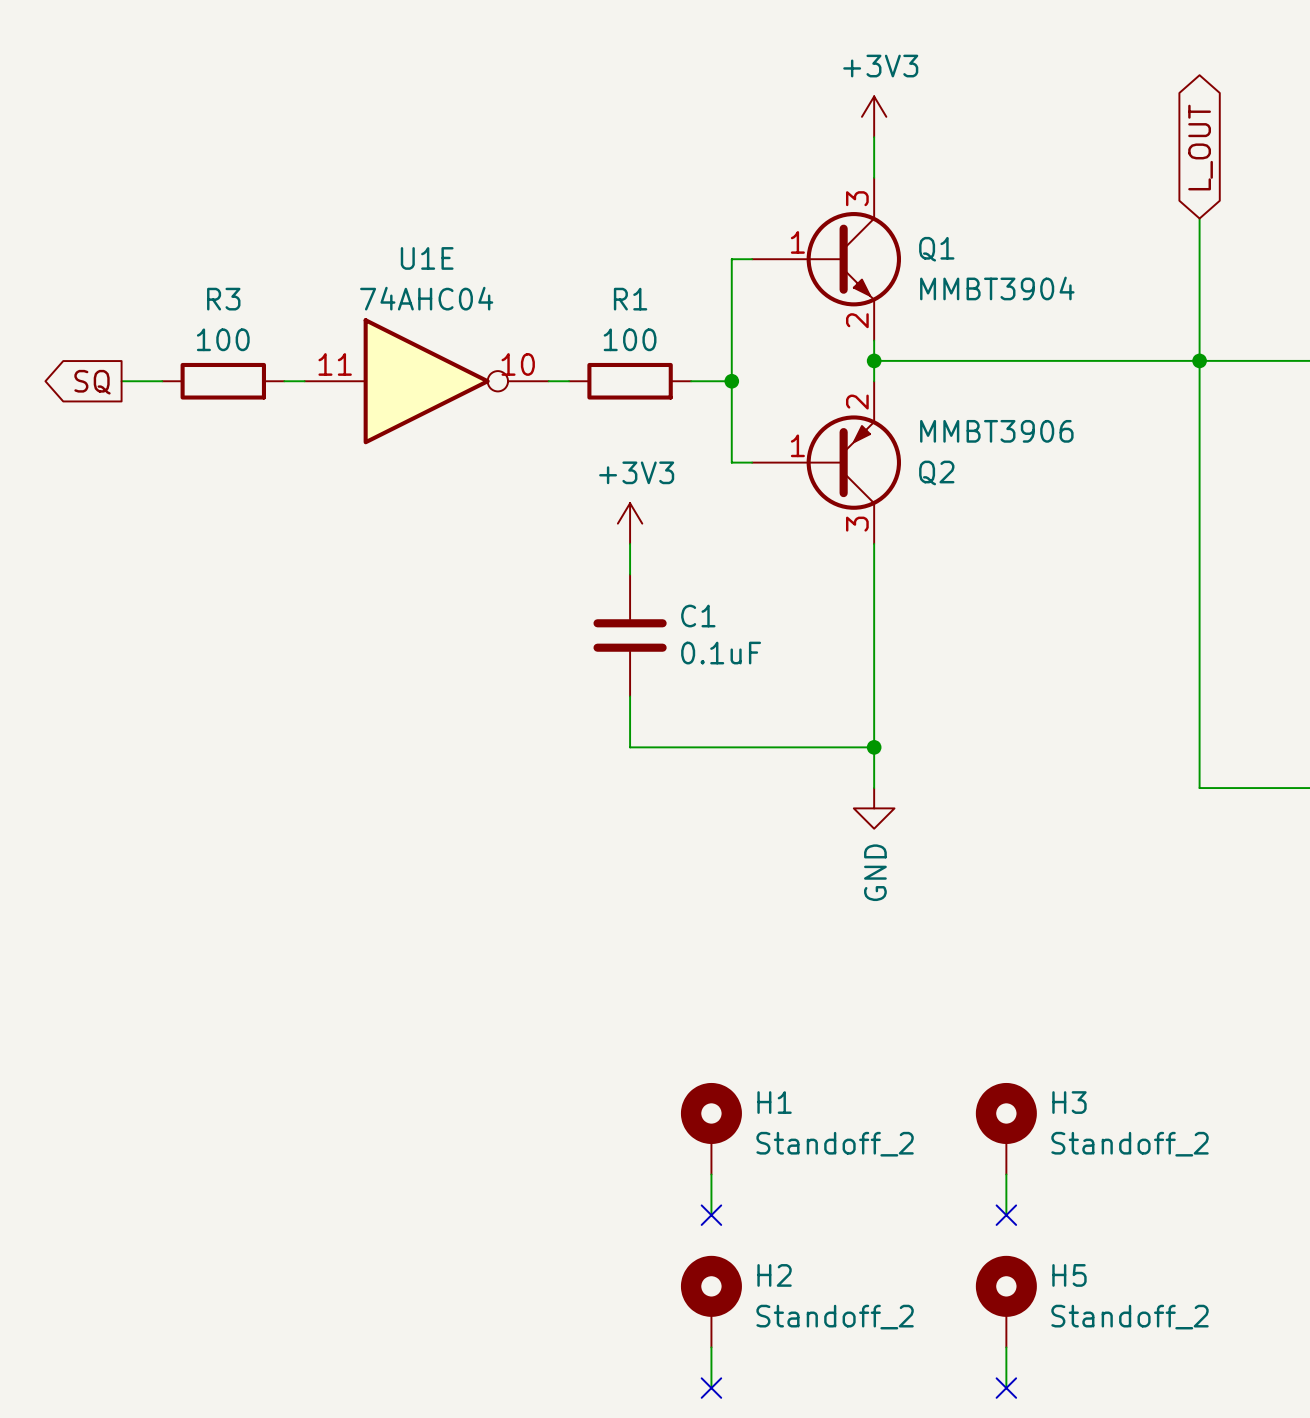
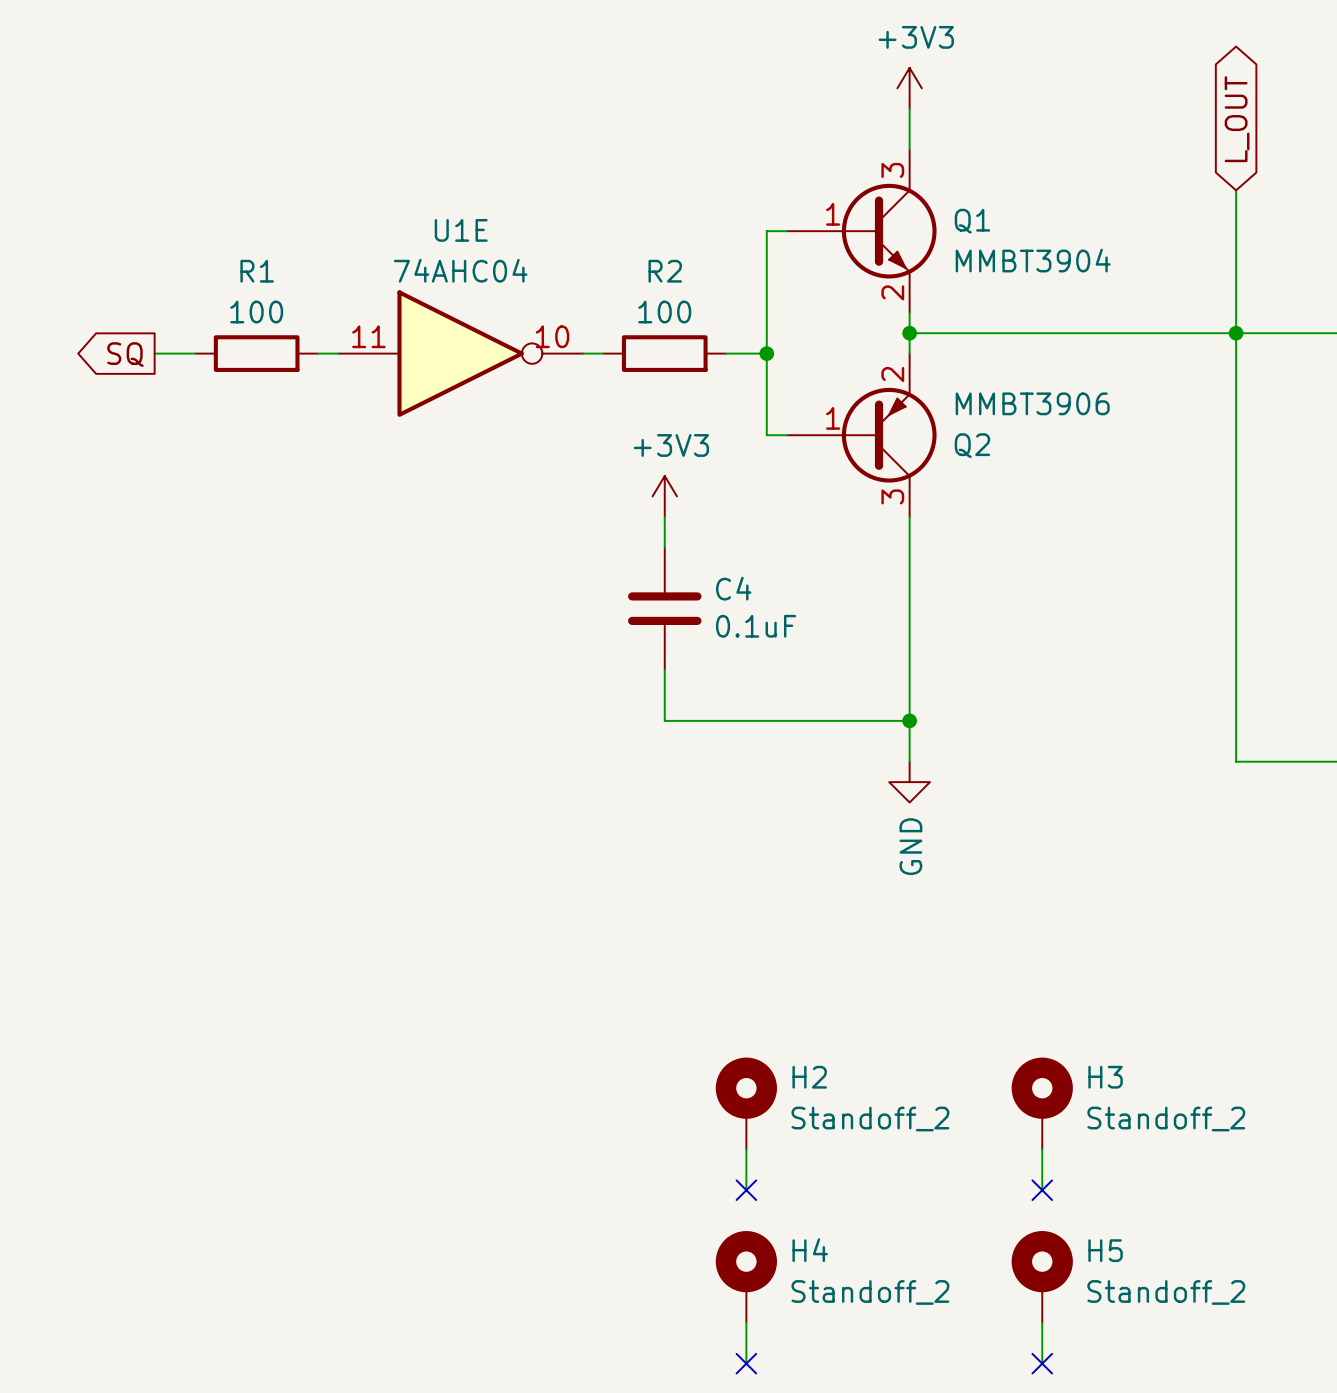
R3 name: R3 (223, 299) -> R1 (257, 271)
R1 name: R1 (630, 299) -> R2 (665, 271)
C1 name: C1 (698, 616) -> C4 (733, 588)
H1 name: H1 (774, 1102) -> H2 (809, 1077)
H2 name: H2 (774, 1275) -> H4 (810, 1250)

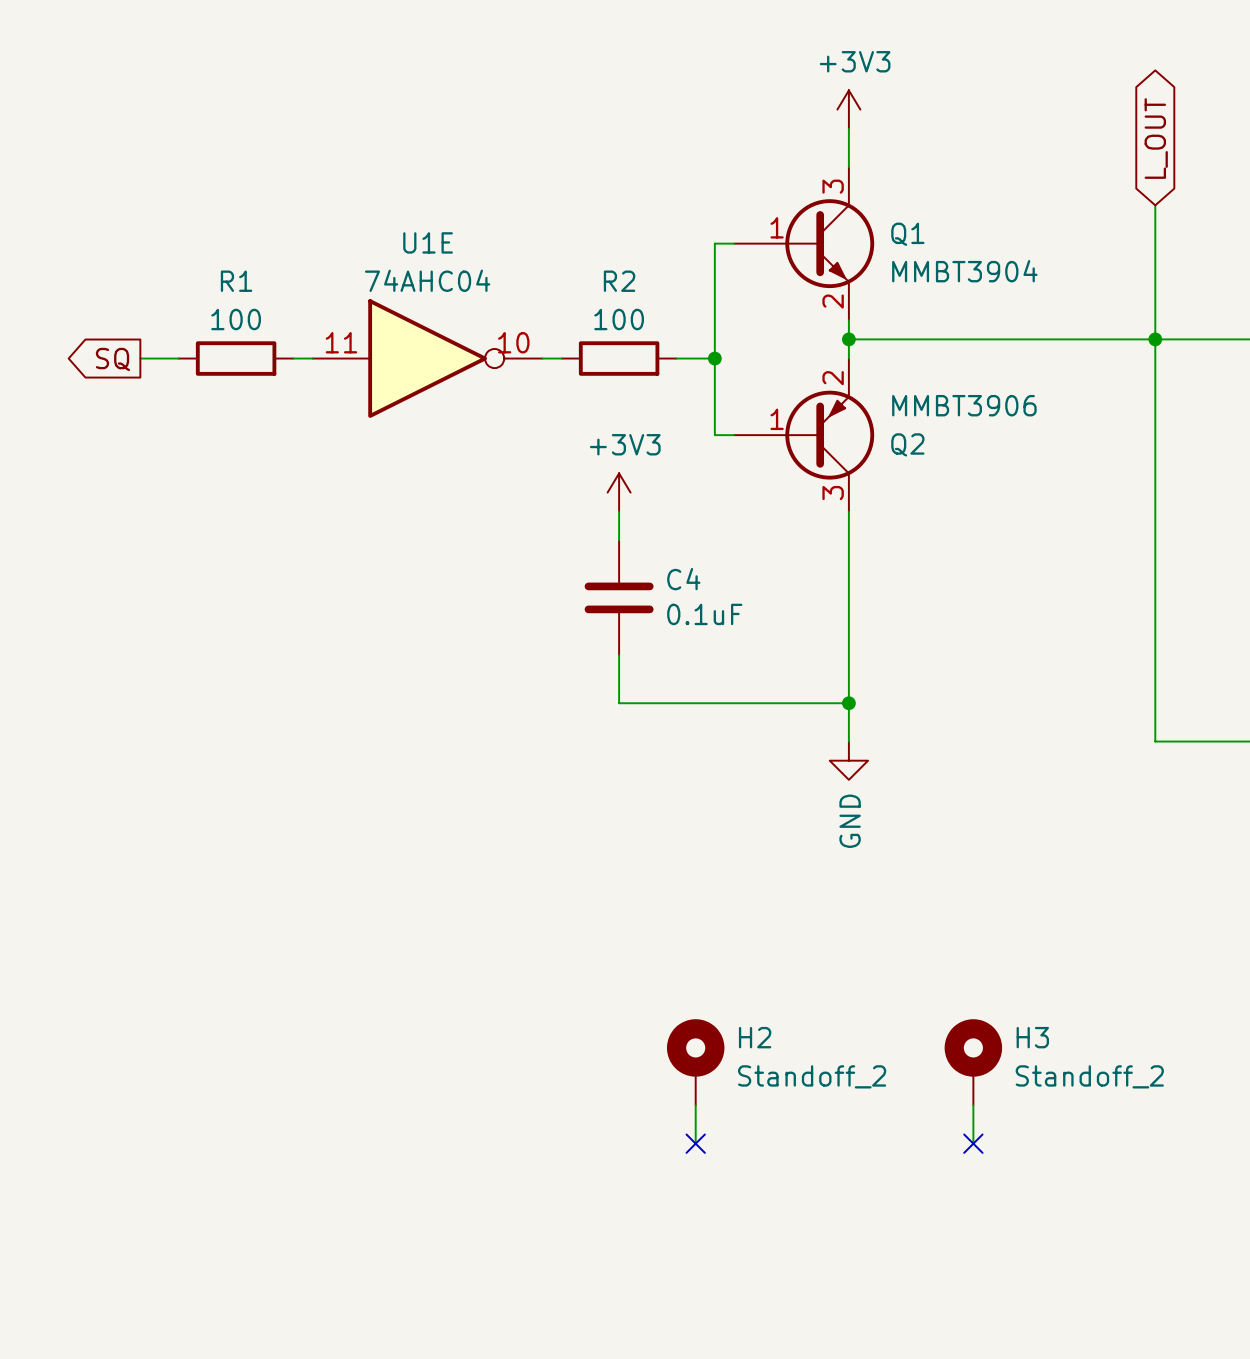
H4: Standoff_2 (746, 1276) -> none
H5: Standoff_2 (1042, 1276) -> none
wire: (746, 1322) (746, 1363) -> none
wire: (1042, 1322) (1042, 1363) -> none
no-connect mark: (746, 1363) -> none
no-connect mark: (1042, 1363) -> none

